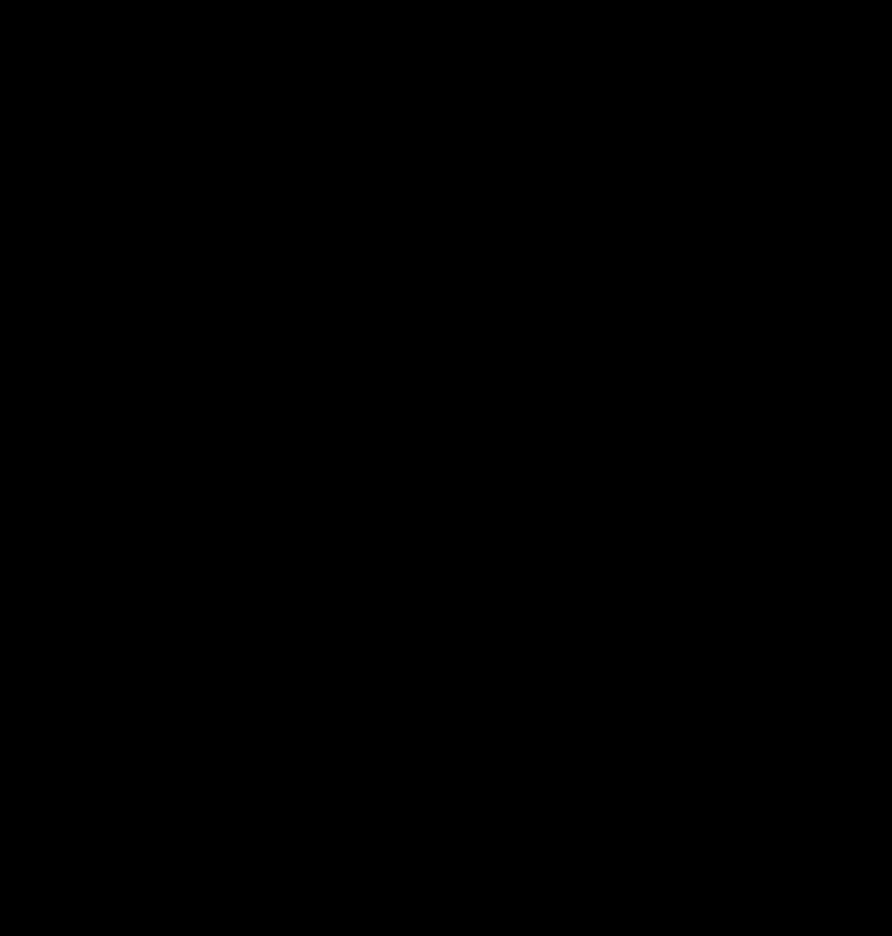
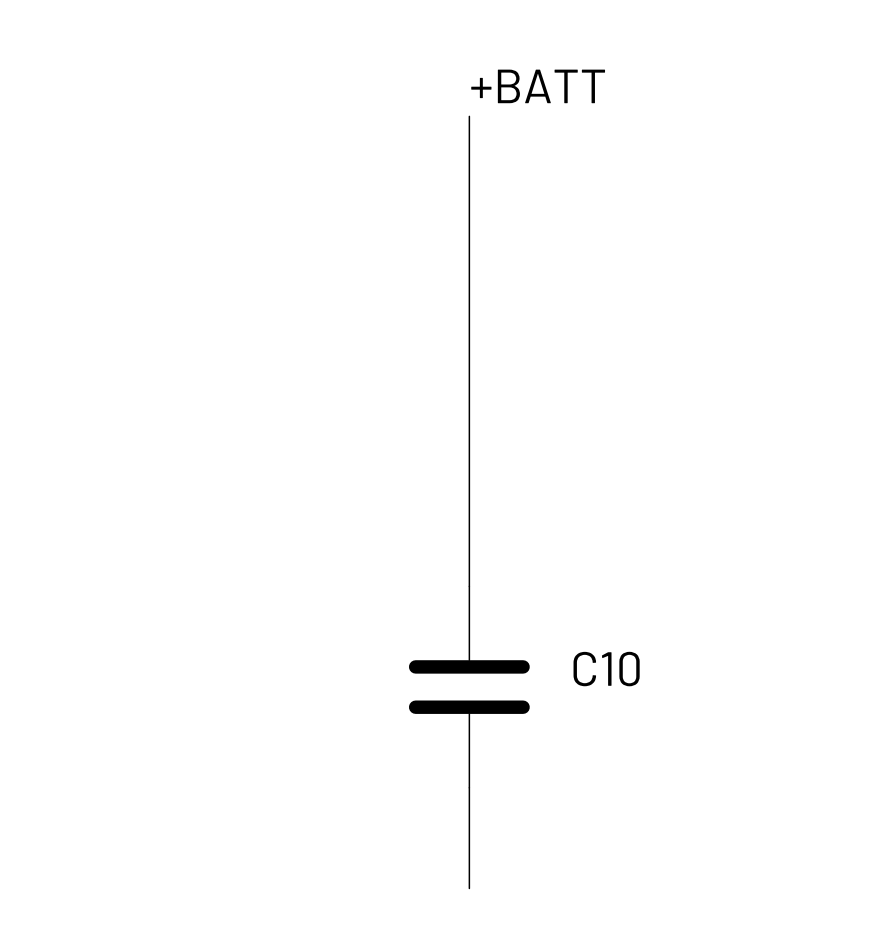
label: none -> +BATT (538, 86)
wire: none -> (469, 116) (469, 586)
C10: none -> (469, 687)
wire: none -> (469, 787) (469, 888)

